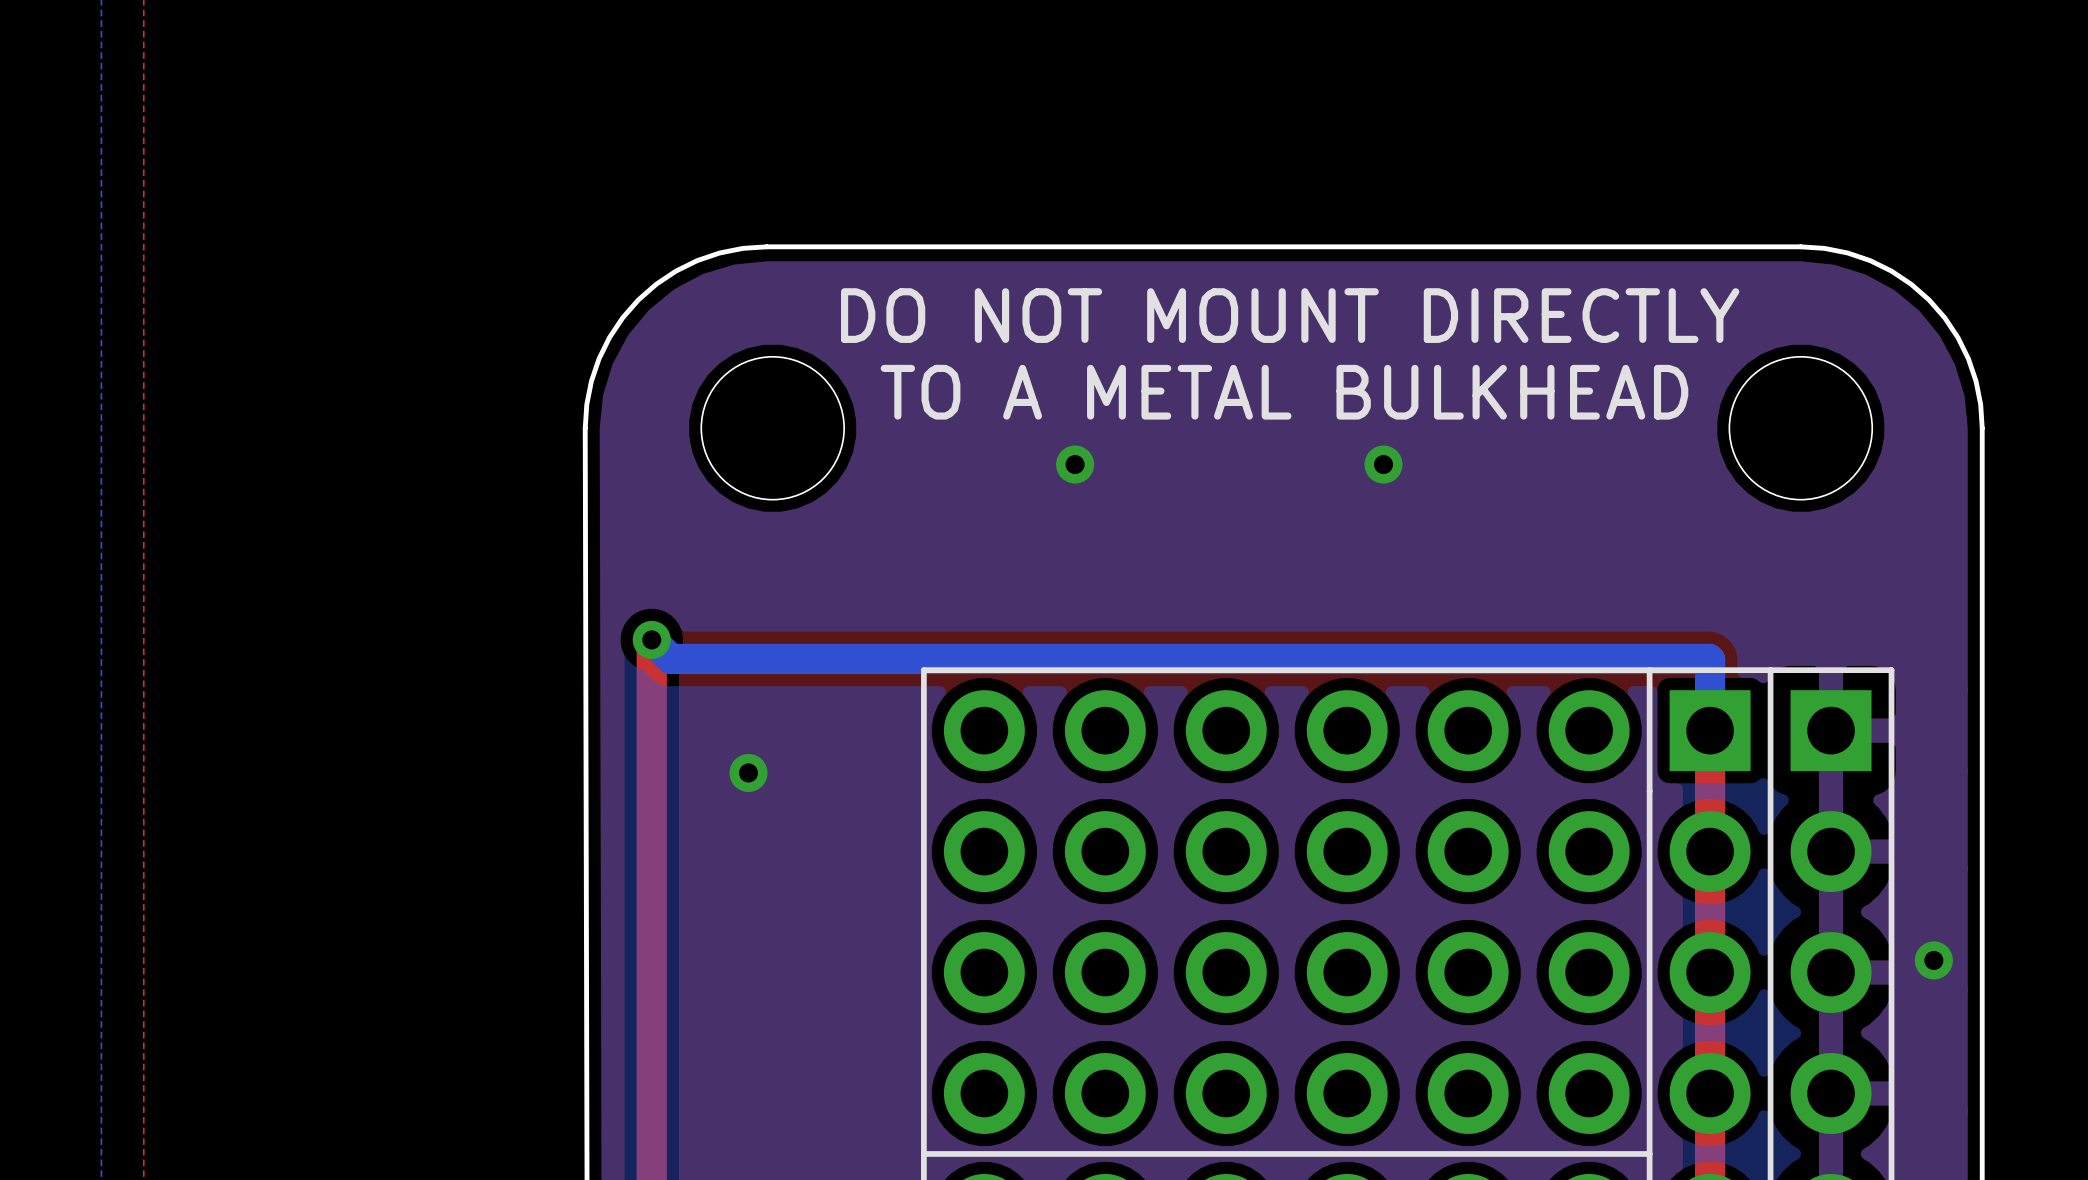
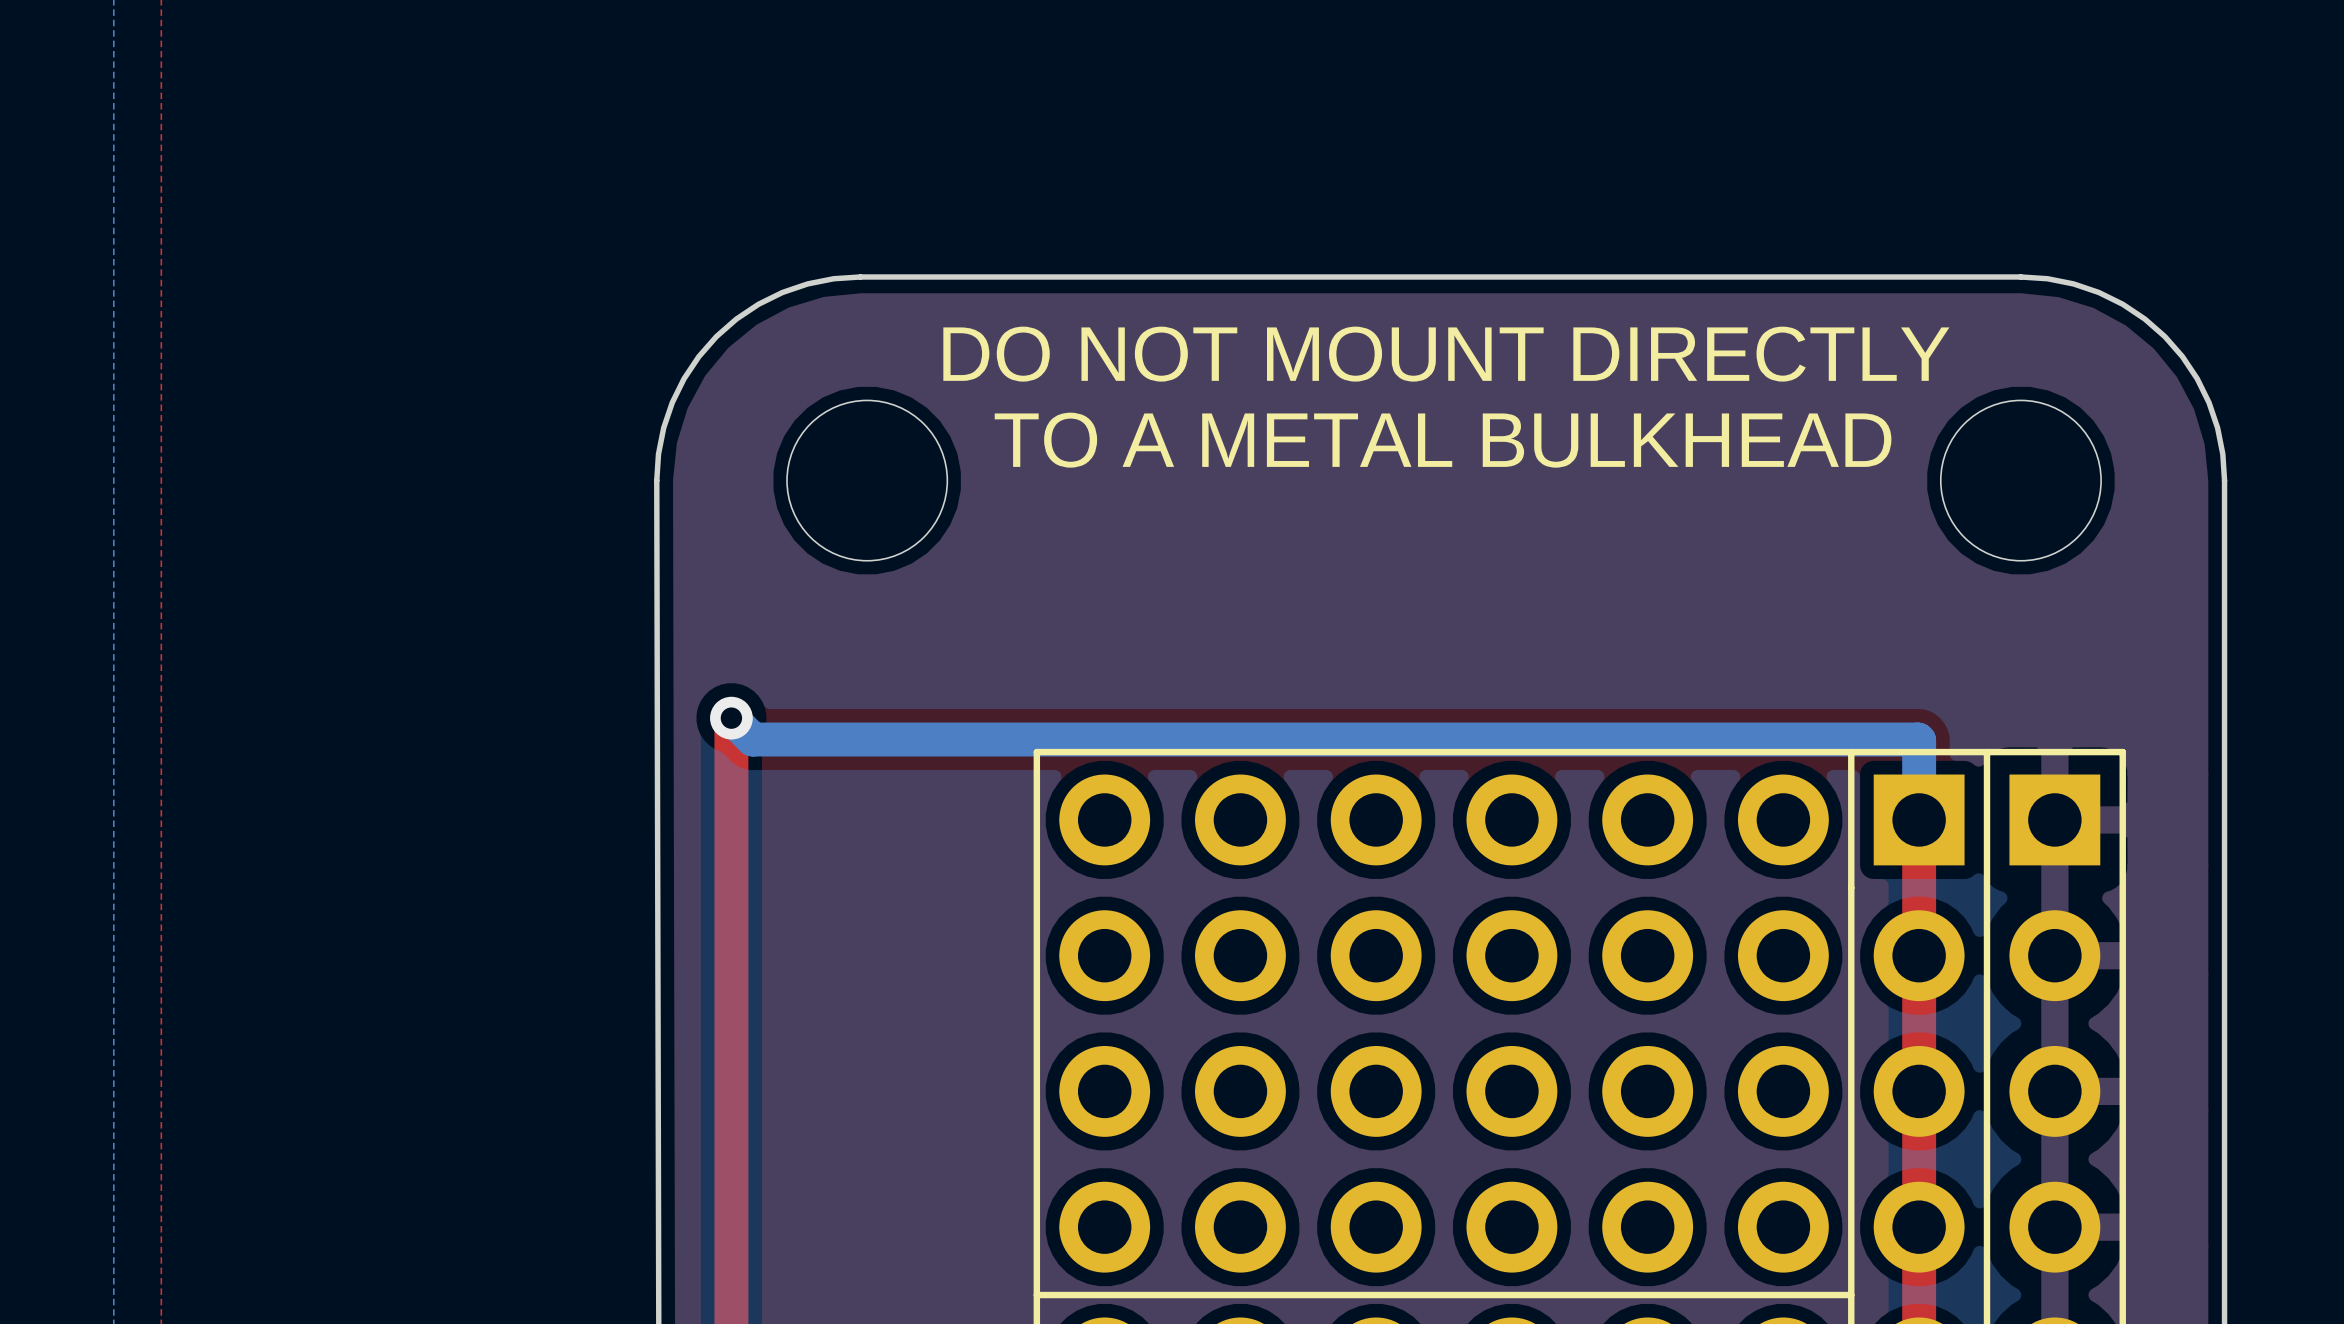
via: (1075, 464) -> none
via: (1383, 464) -> none
via: (748, 772) -> none
via: (1933, 960) -> none

